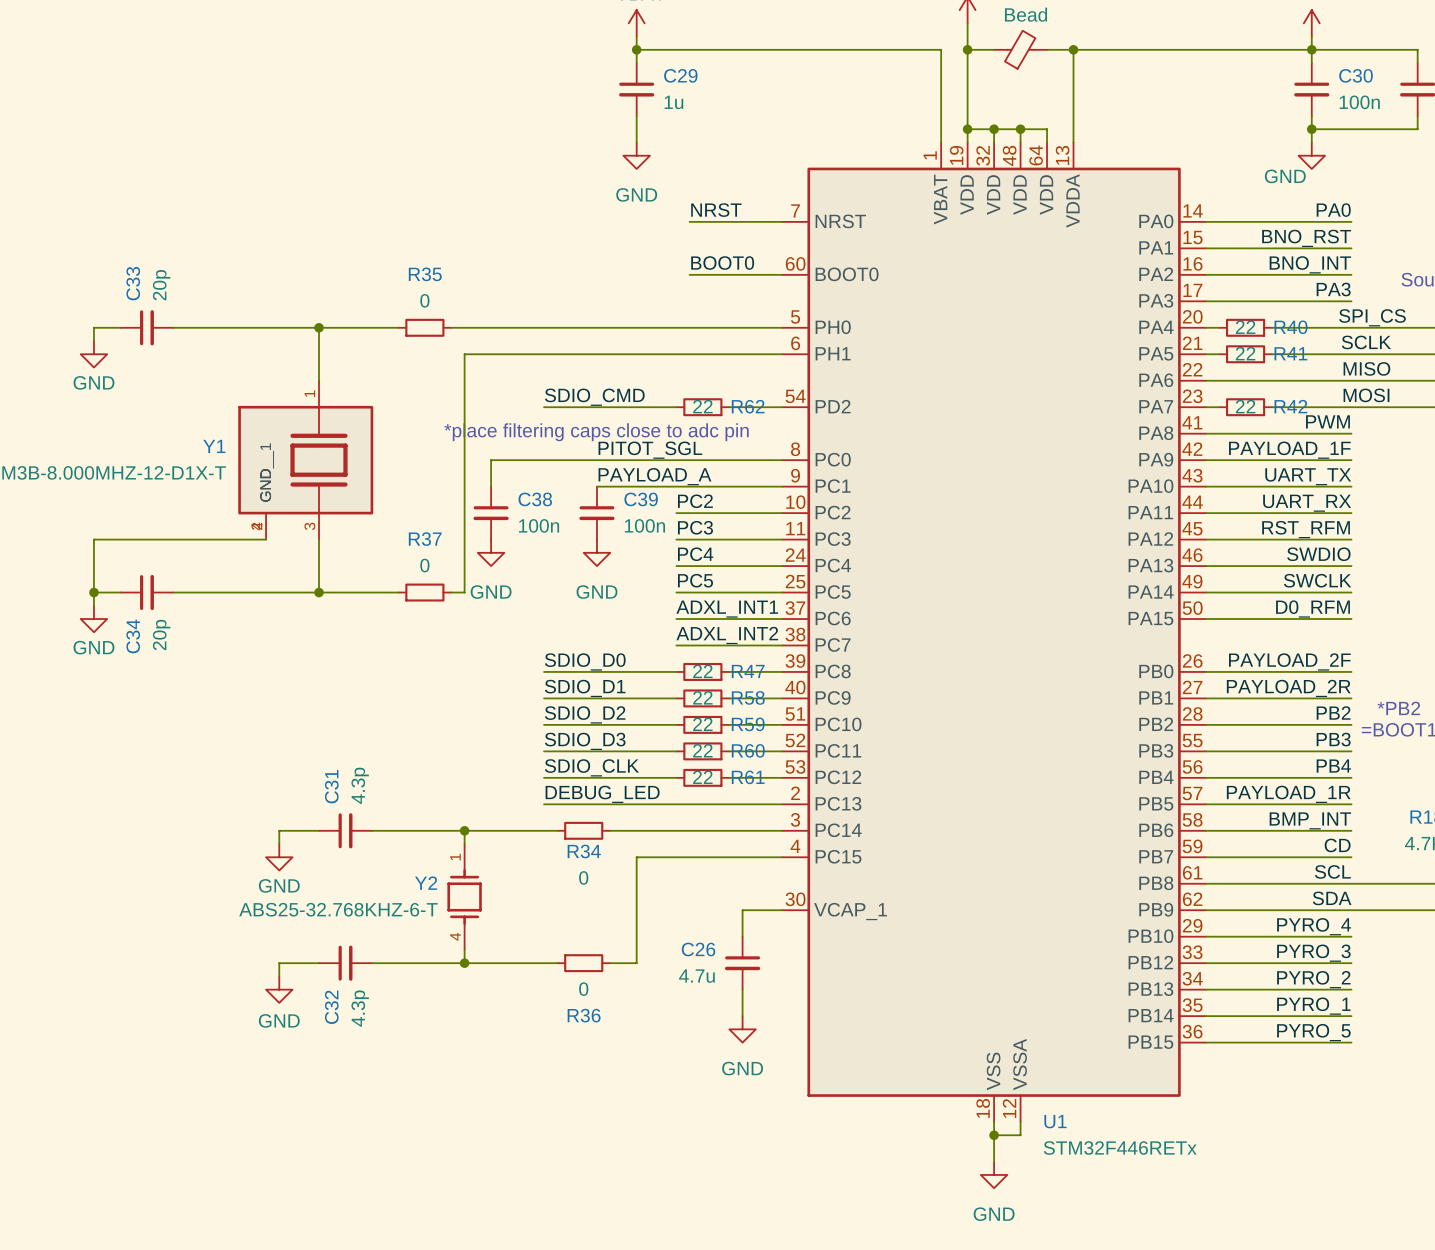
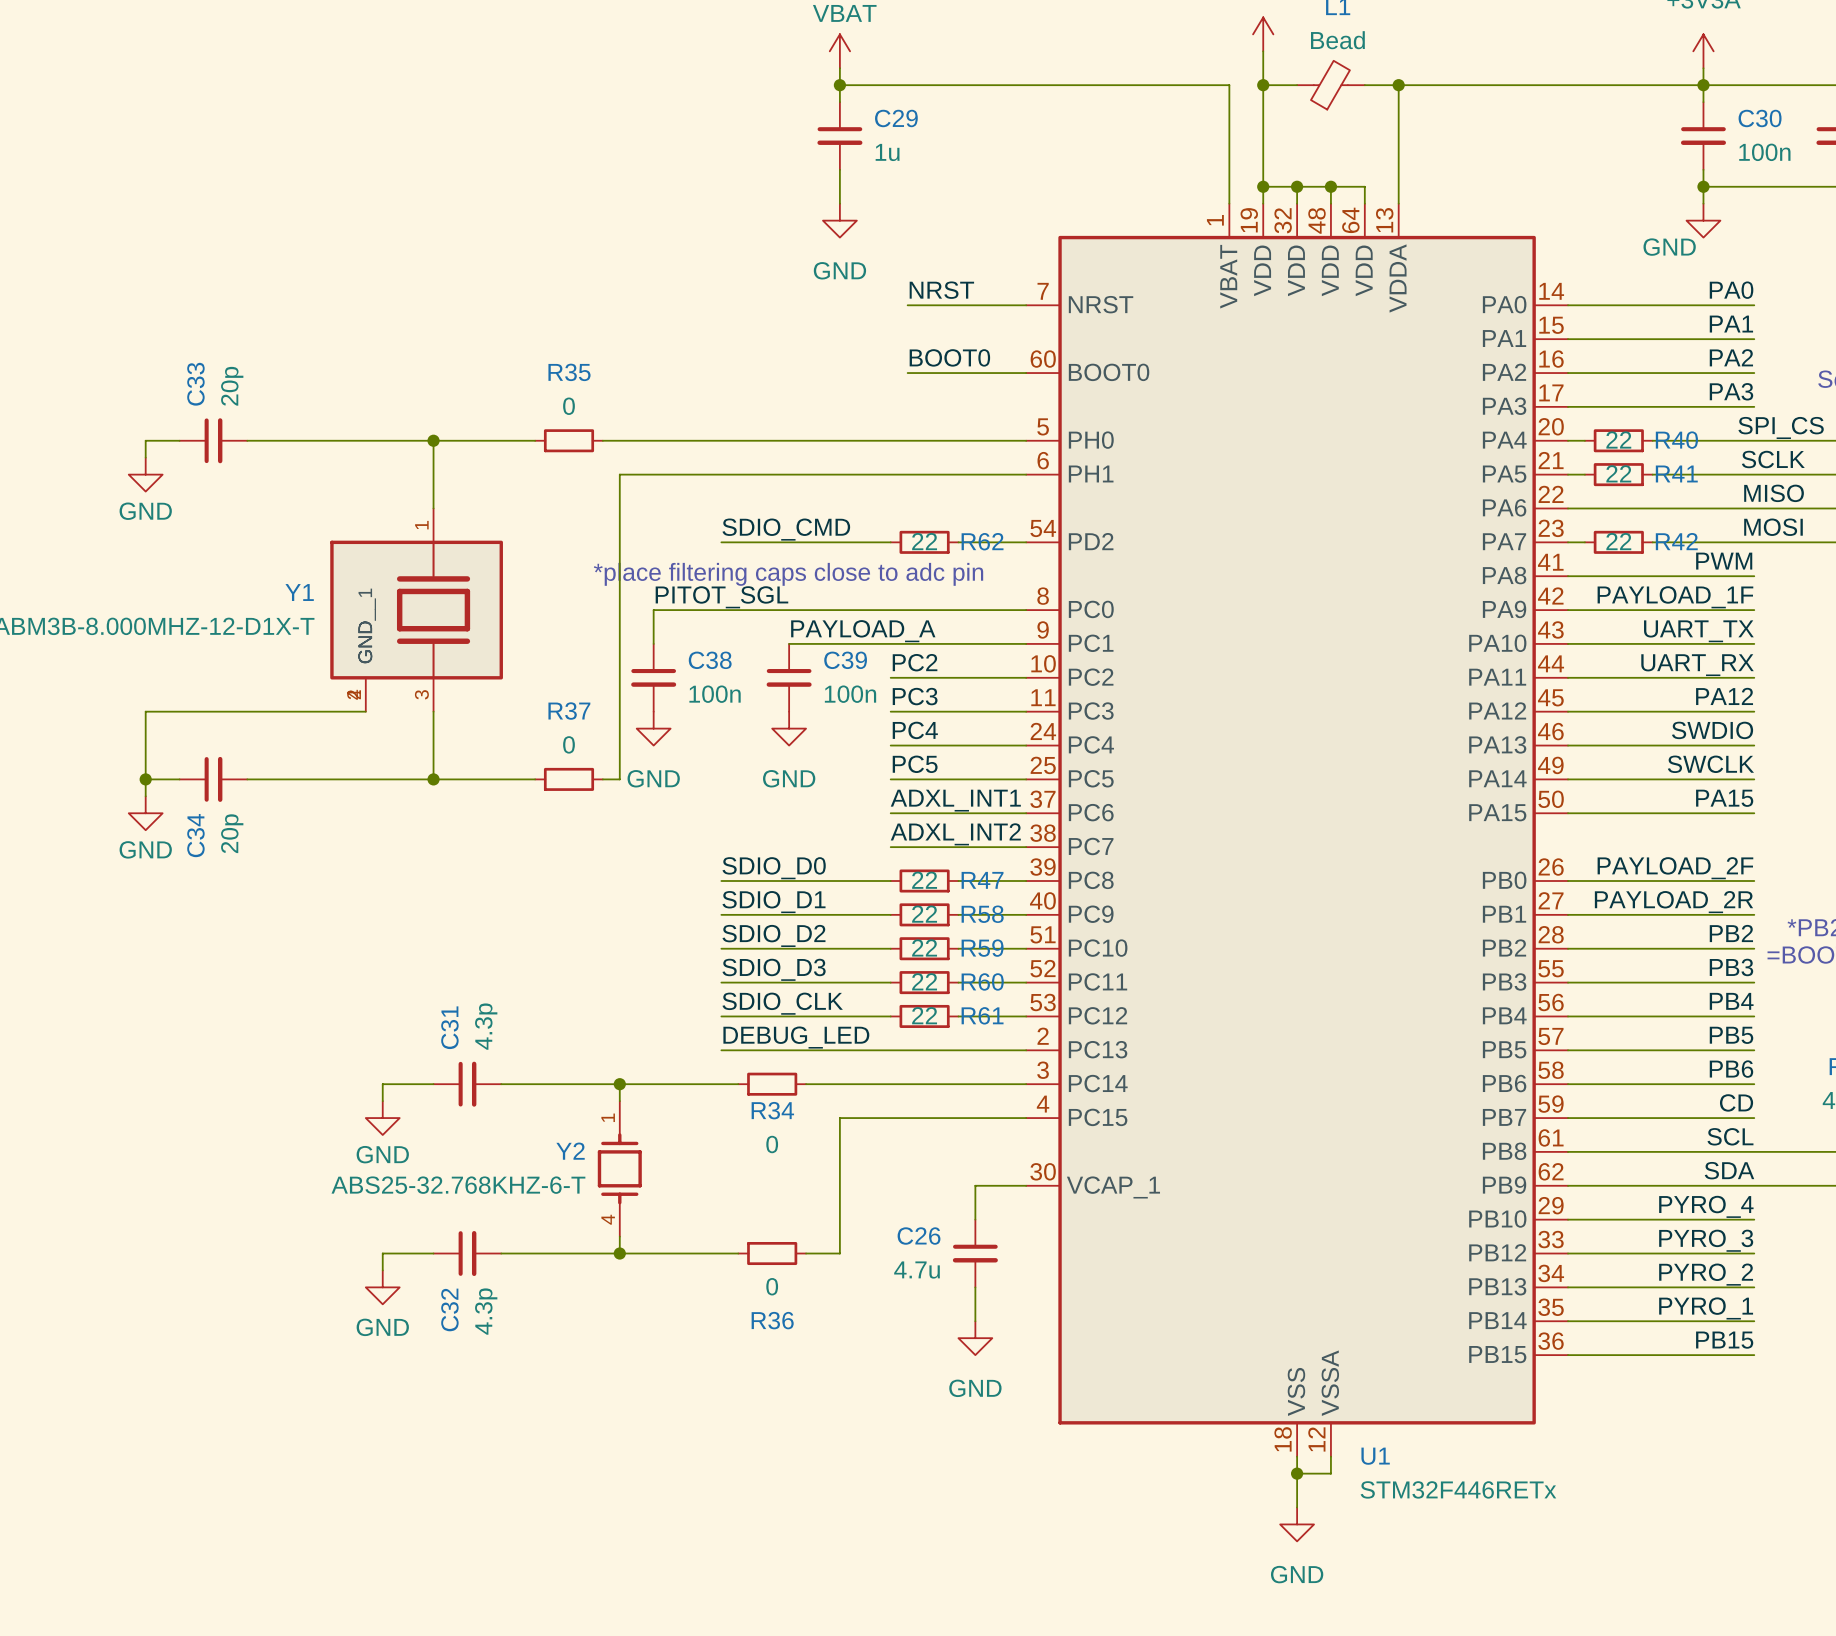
label: BNO_RST (1306, 238) -> PA1 (1731, 324)
label: BNO_INT (1310, 264) -> PA2 (1731, 357)
label position: PITOT_SGL (650, 450) -> PITOT_SGL (721, 597)
label: RST_RFM (1306, 529) -> PA12 (1724, 696)
label: D0_RFM (1313, 609) -> PA15 (1724, 798)
label: PAYLOAD_1R (1288, 794) -> PB5 (1731, 1035)
label: BMP_INT (1310, 820) -> PB6 (1731, 1069)
label: PYRO_5 (1313, 1032) -> PB15 (1724, 1340)

